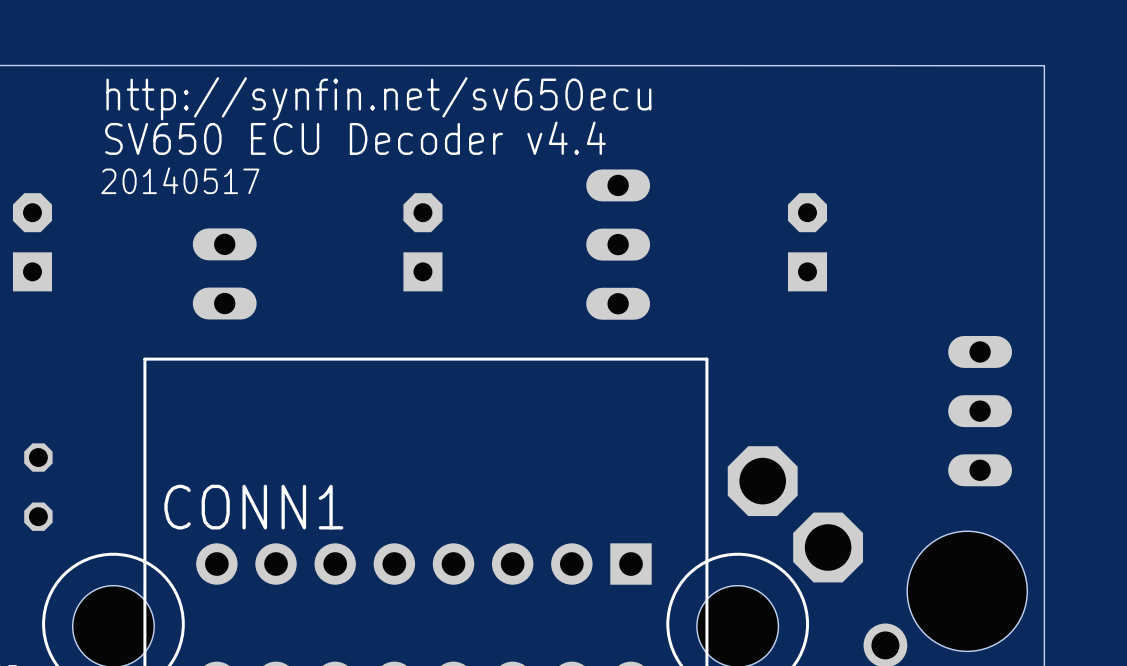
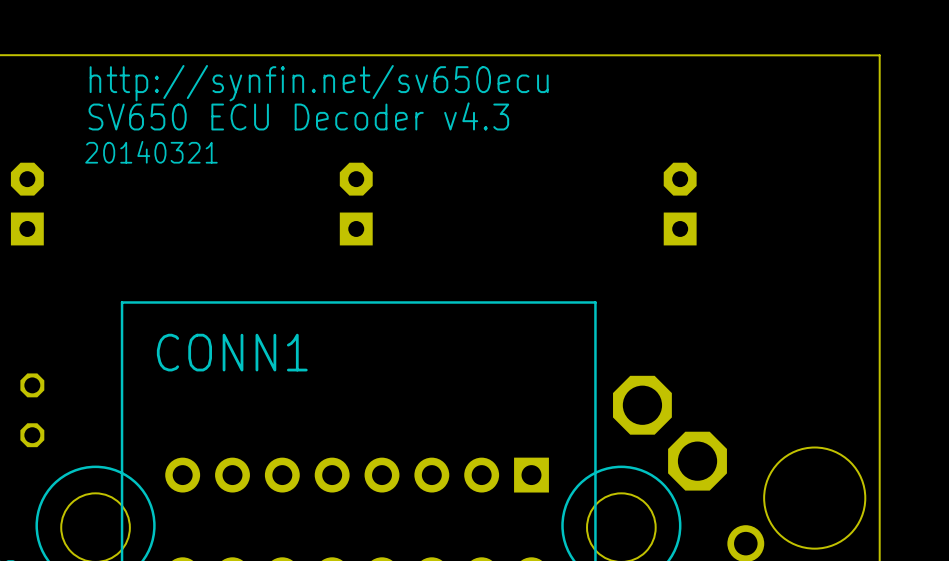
text: SV650 ECU Decoder v4.4 (355, 138) -> SV650 ECU Decoder v4.3 (298, 116)
text: 20140517 (180, 180) -> 20140321 (151, 152)
part: (618, 244) -> none
part: (224, 273) -> none
part: (980, 411) -> none
text position: CONN1 (253, 507) -> CONN1 (232, 352)

